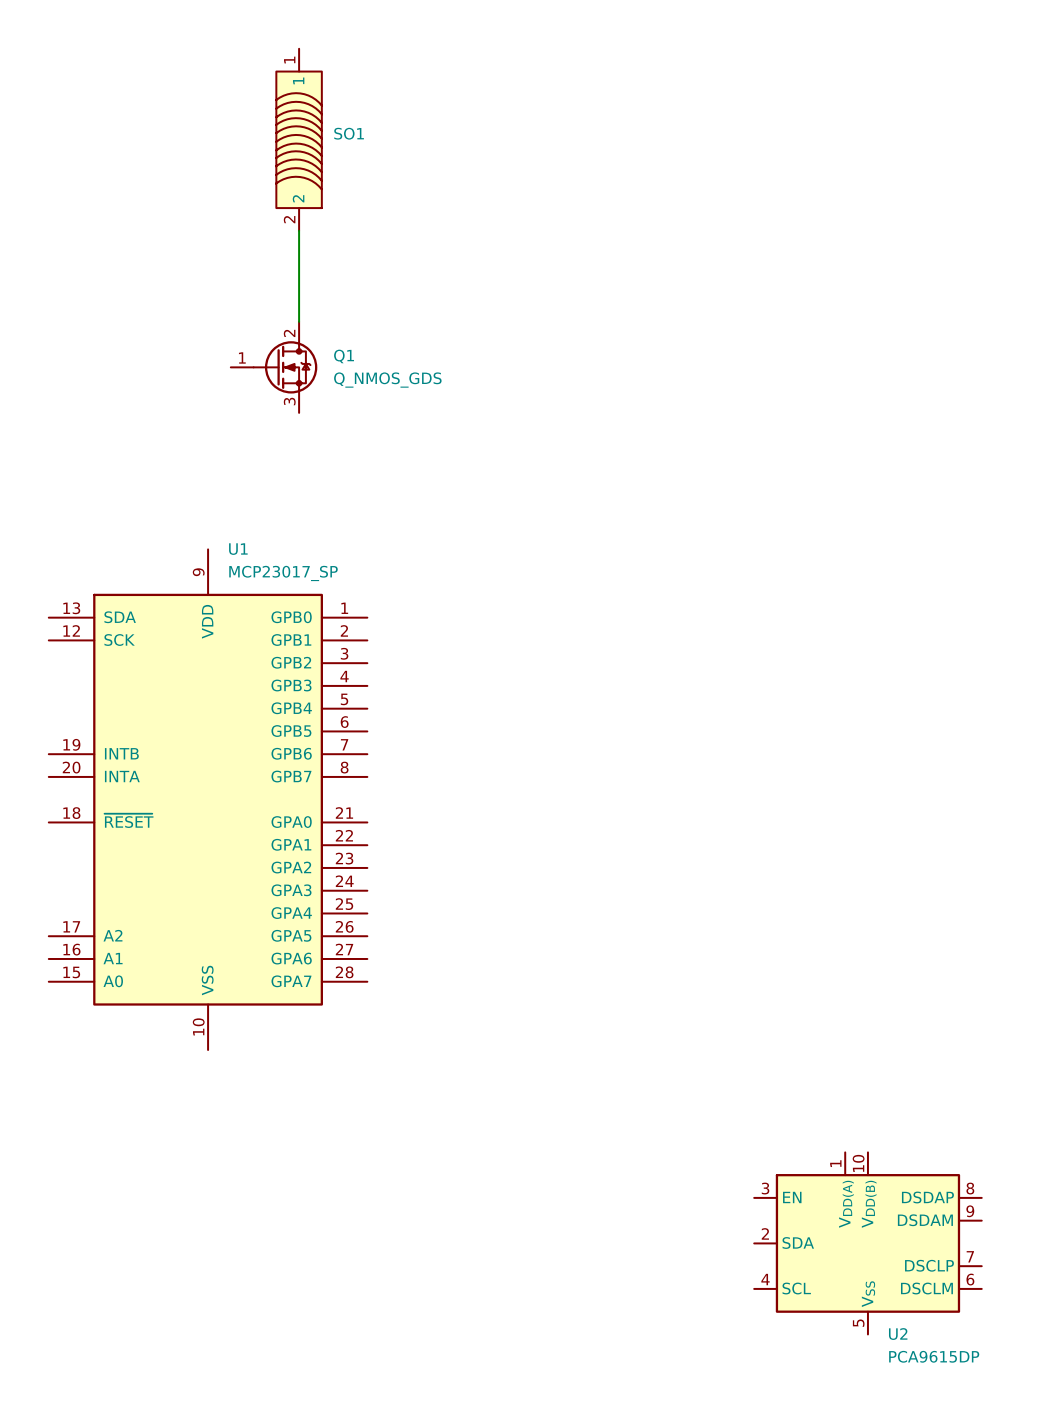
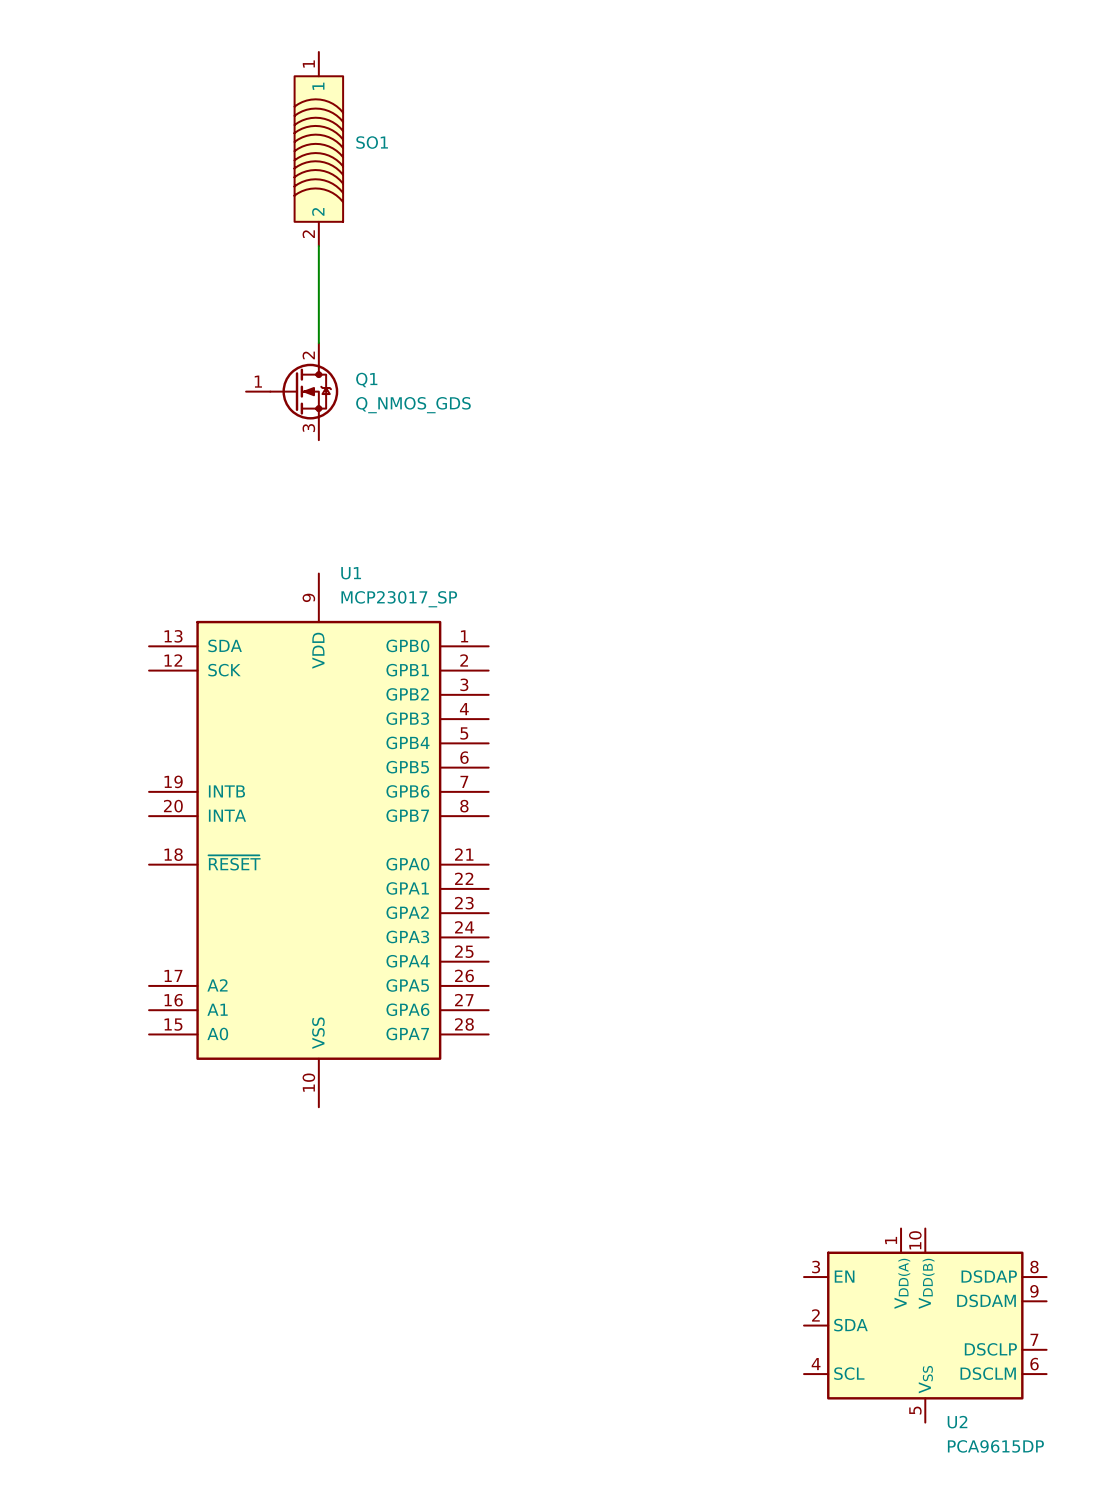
U1 position: (208, 799) -> (318, 840)

